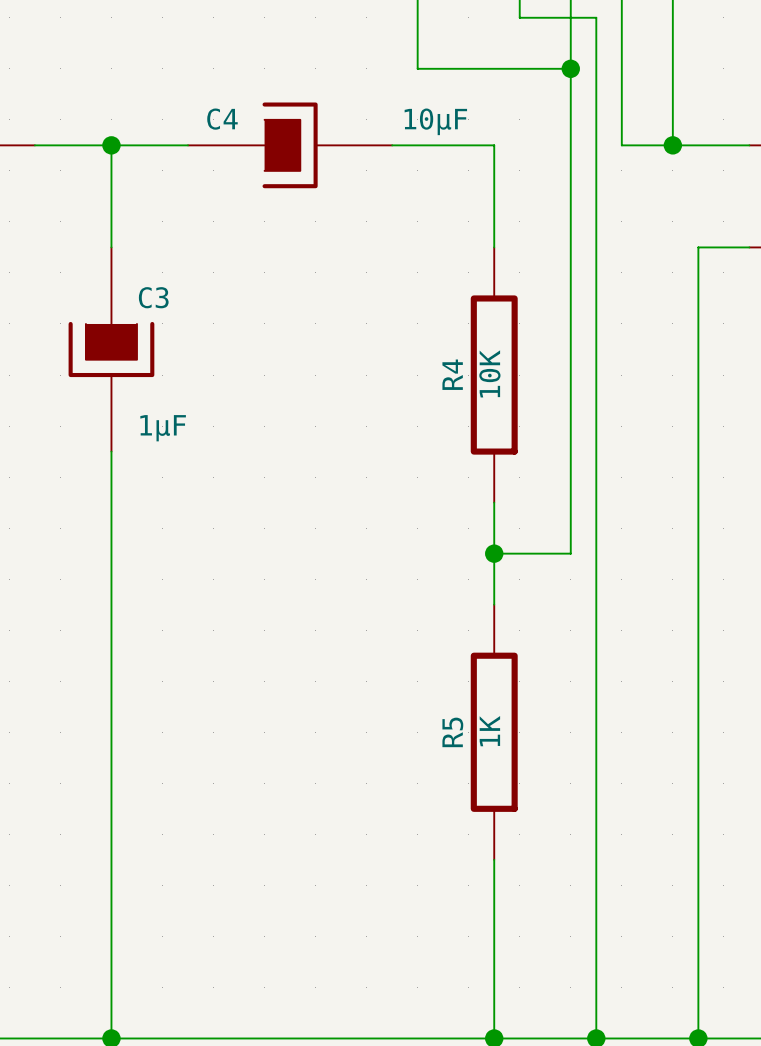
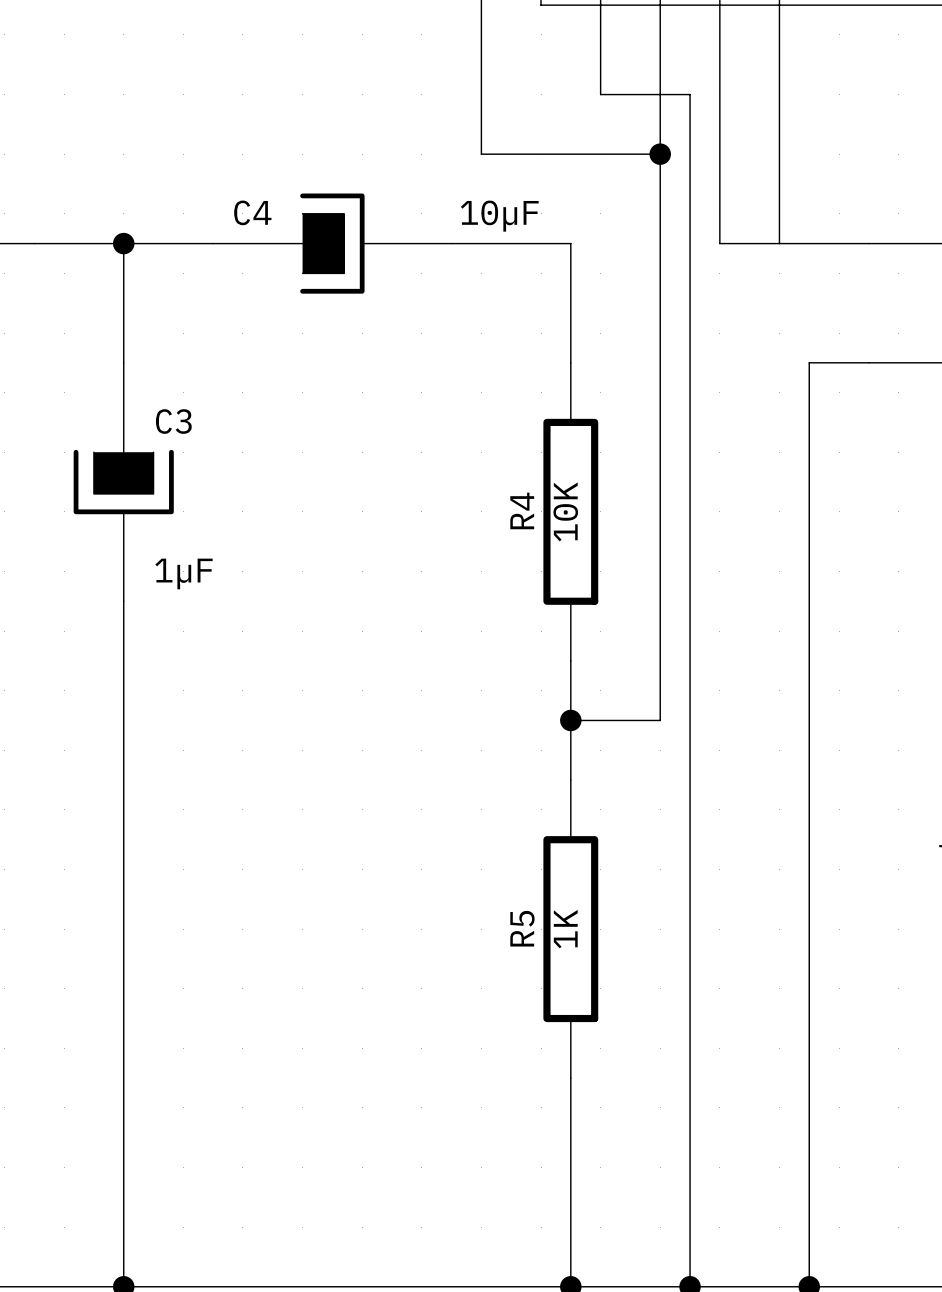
junction: (672, 145) -> none

